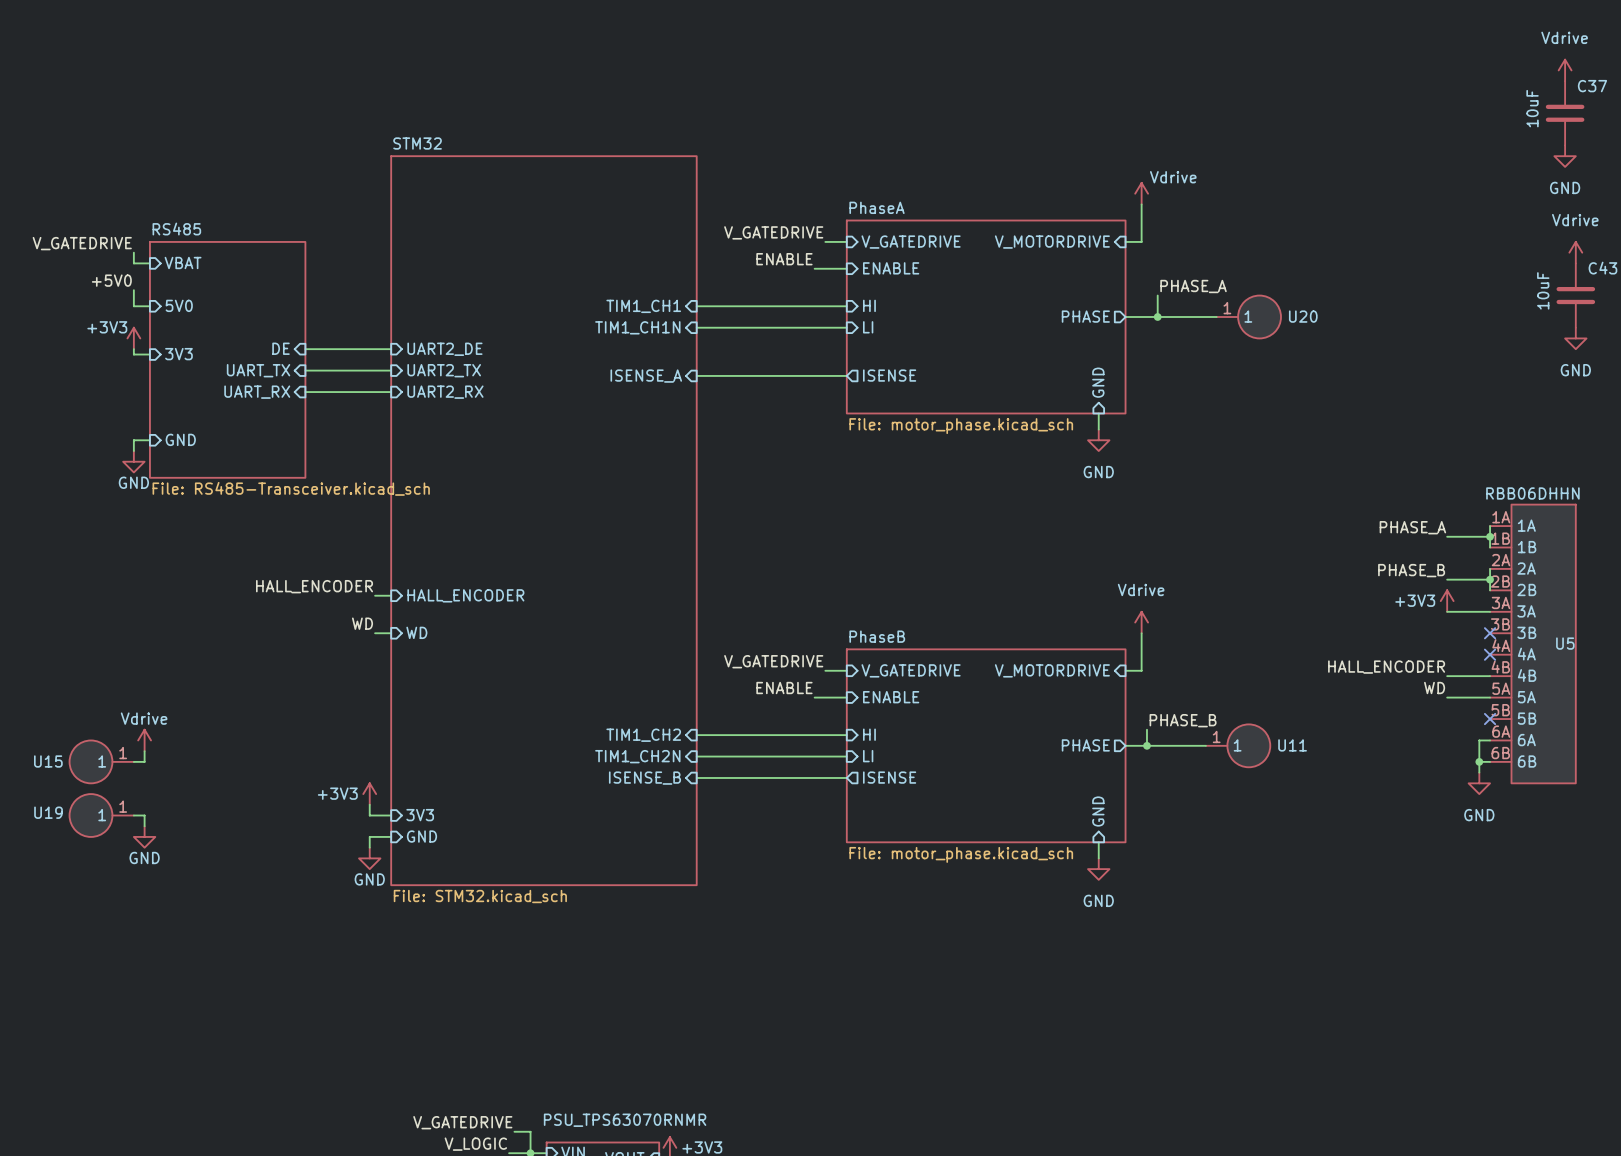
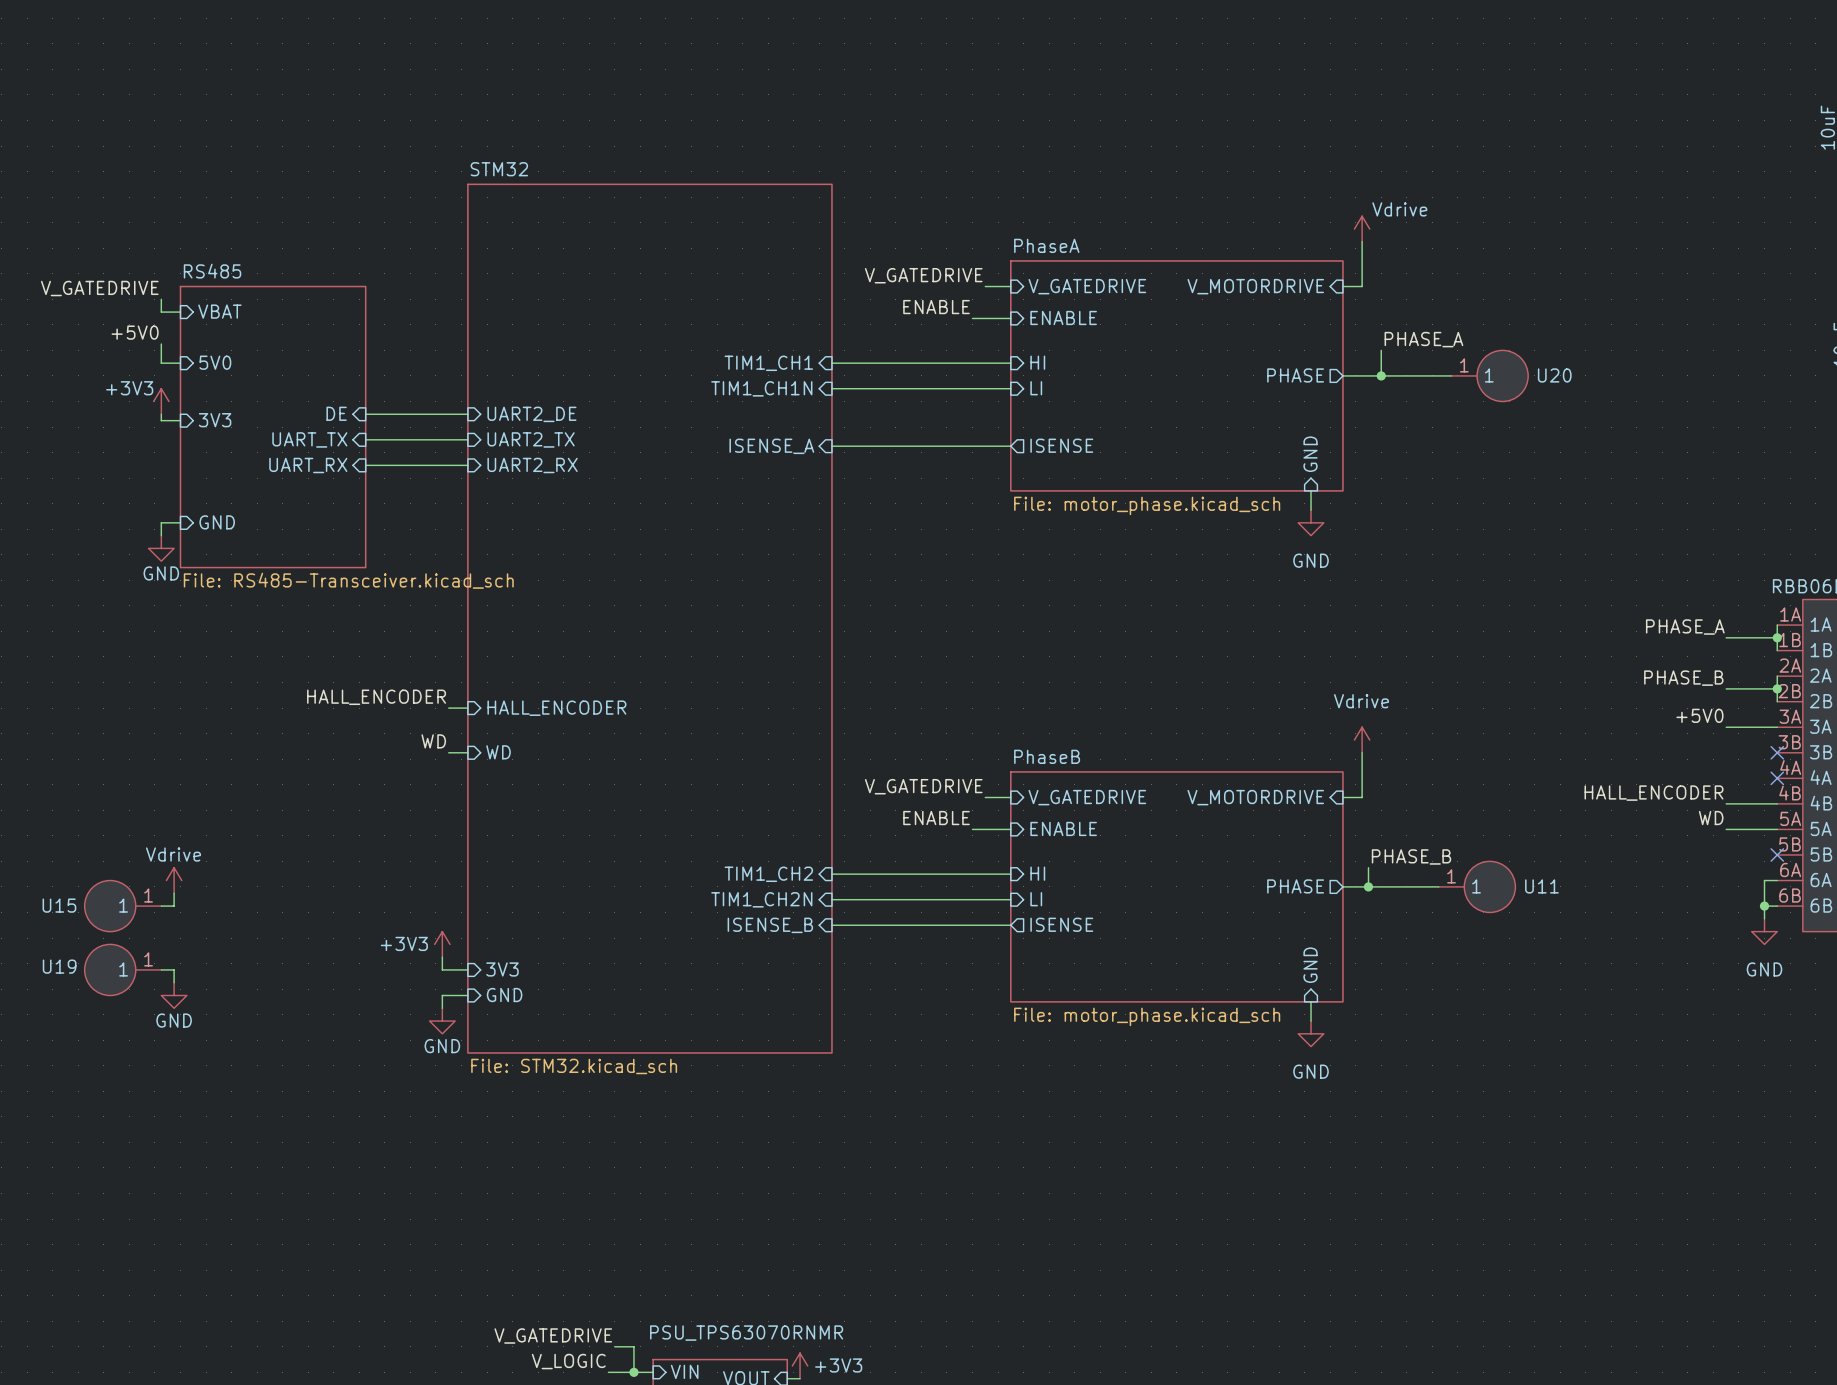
power symbol: +3V3 (1447, 601) -> none
label: none -> +5V0 (1699, 715)

